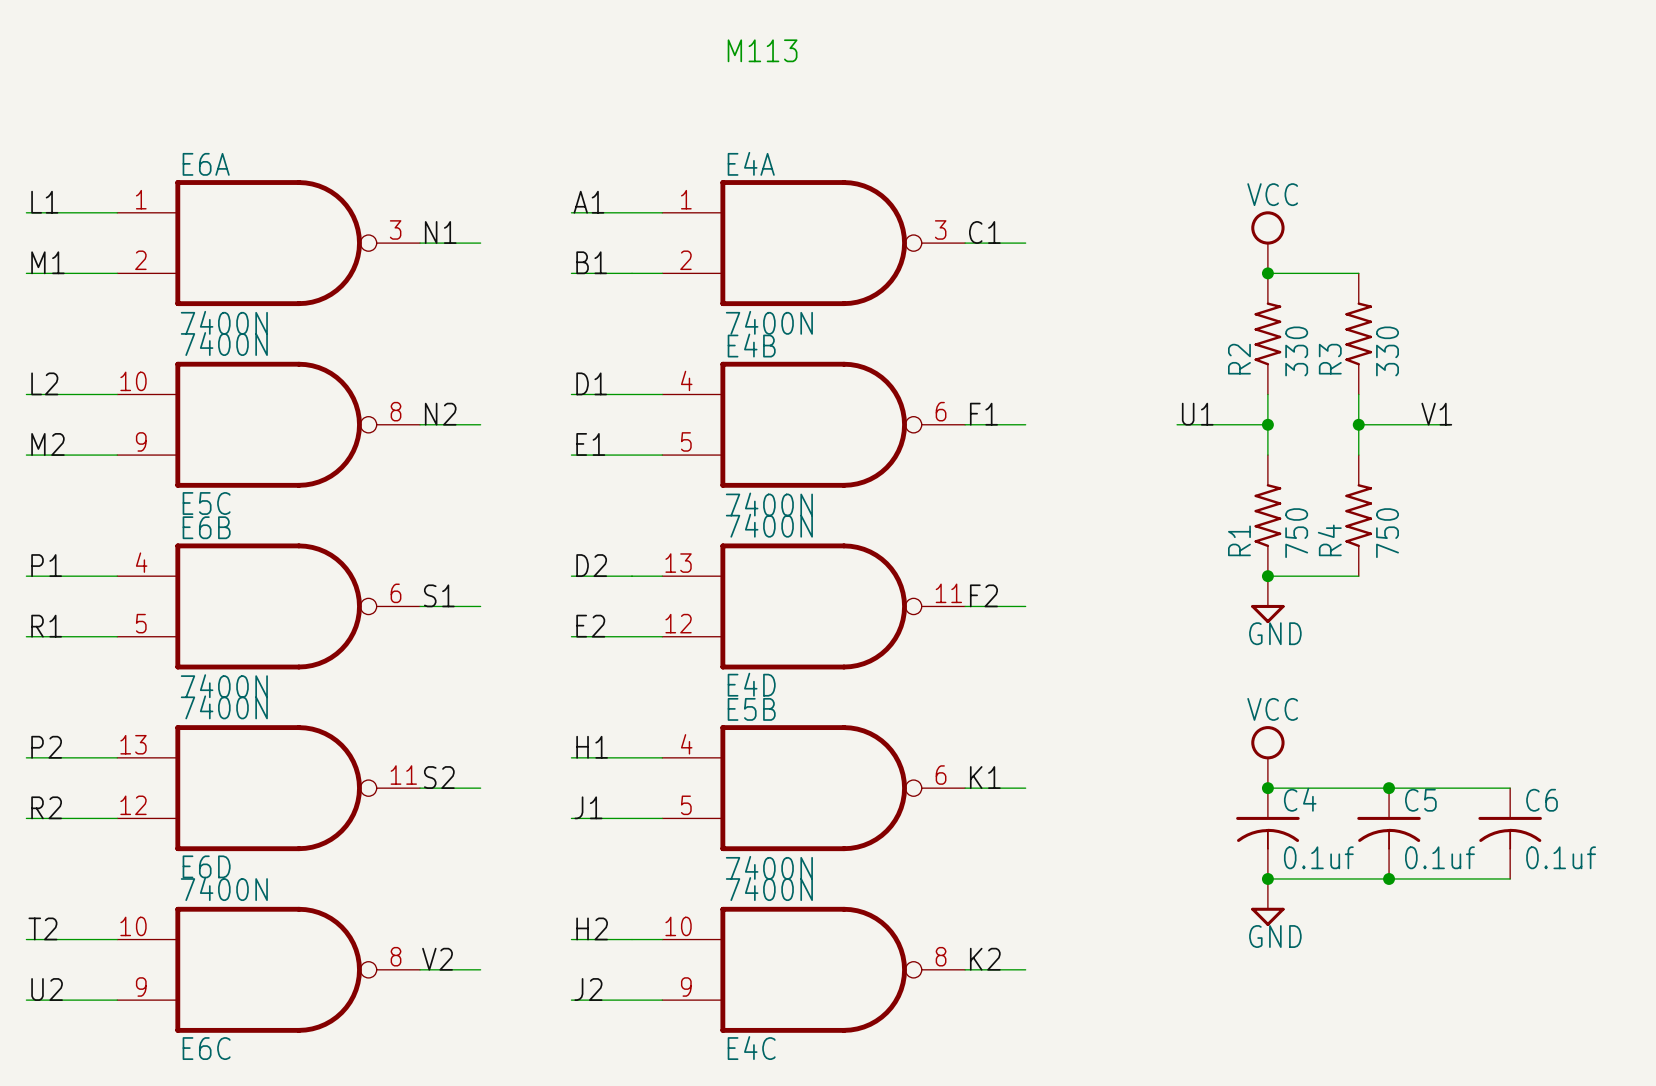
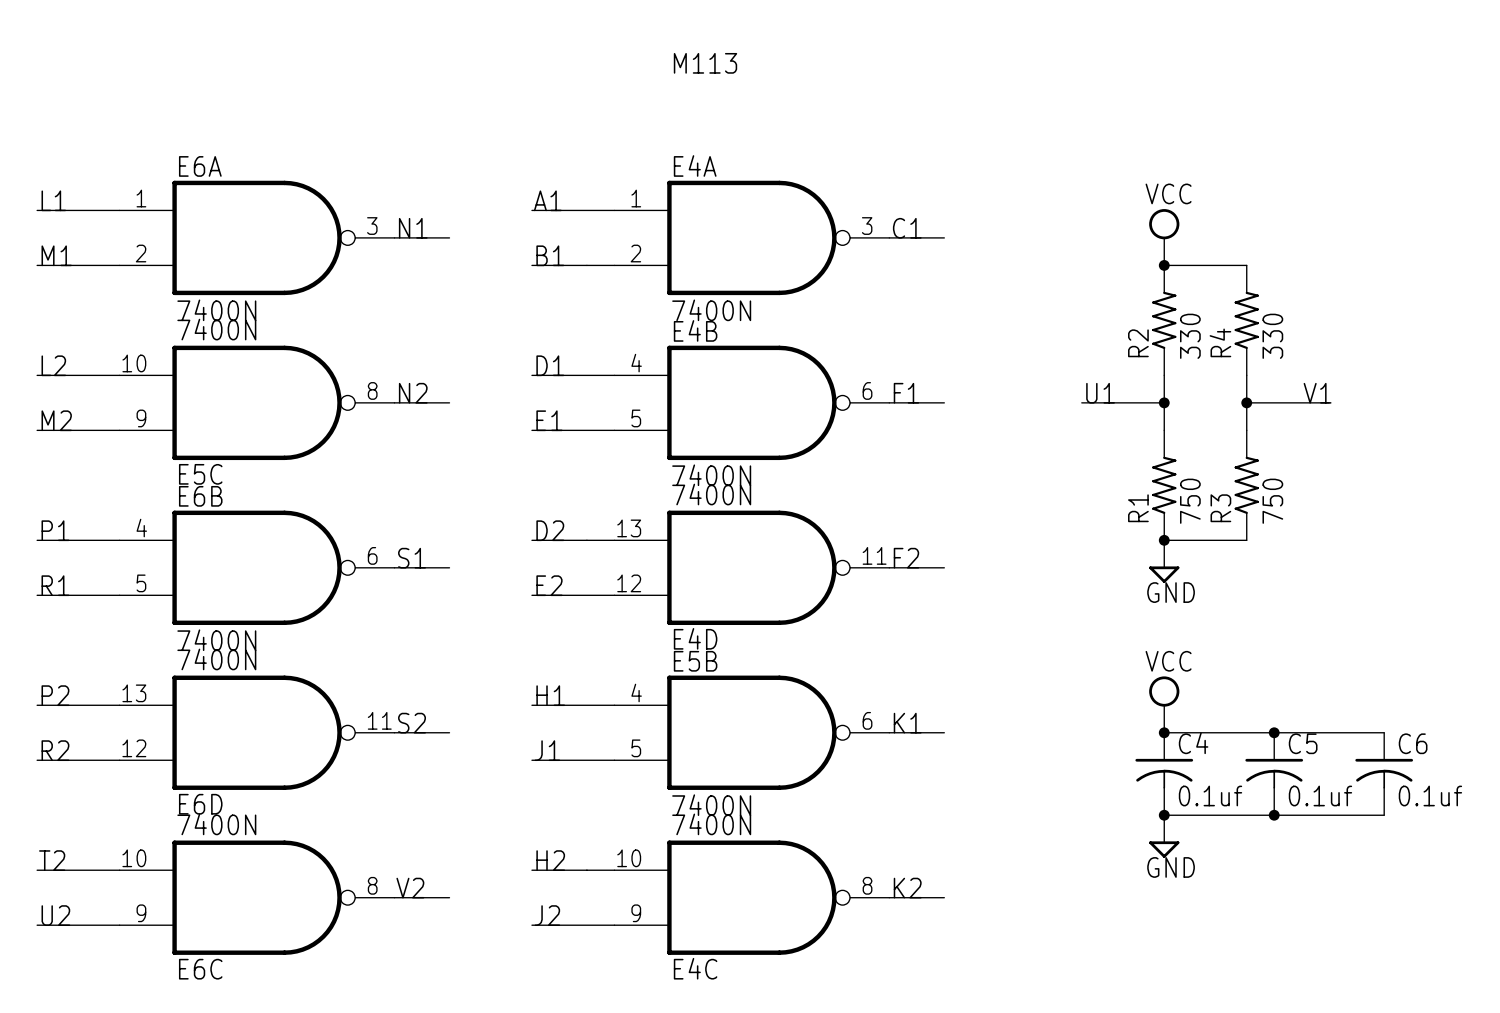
R3 name: R3 (1330, 359) -> R4 (1220, 342)
R4 name: R4 (1329, 540) -> R3 (1220, 508)

